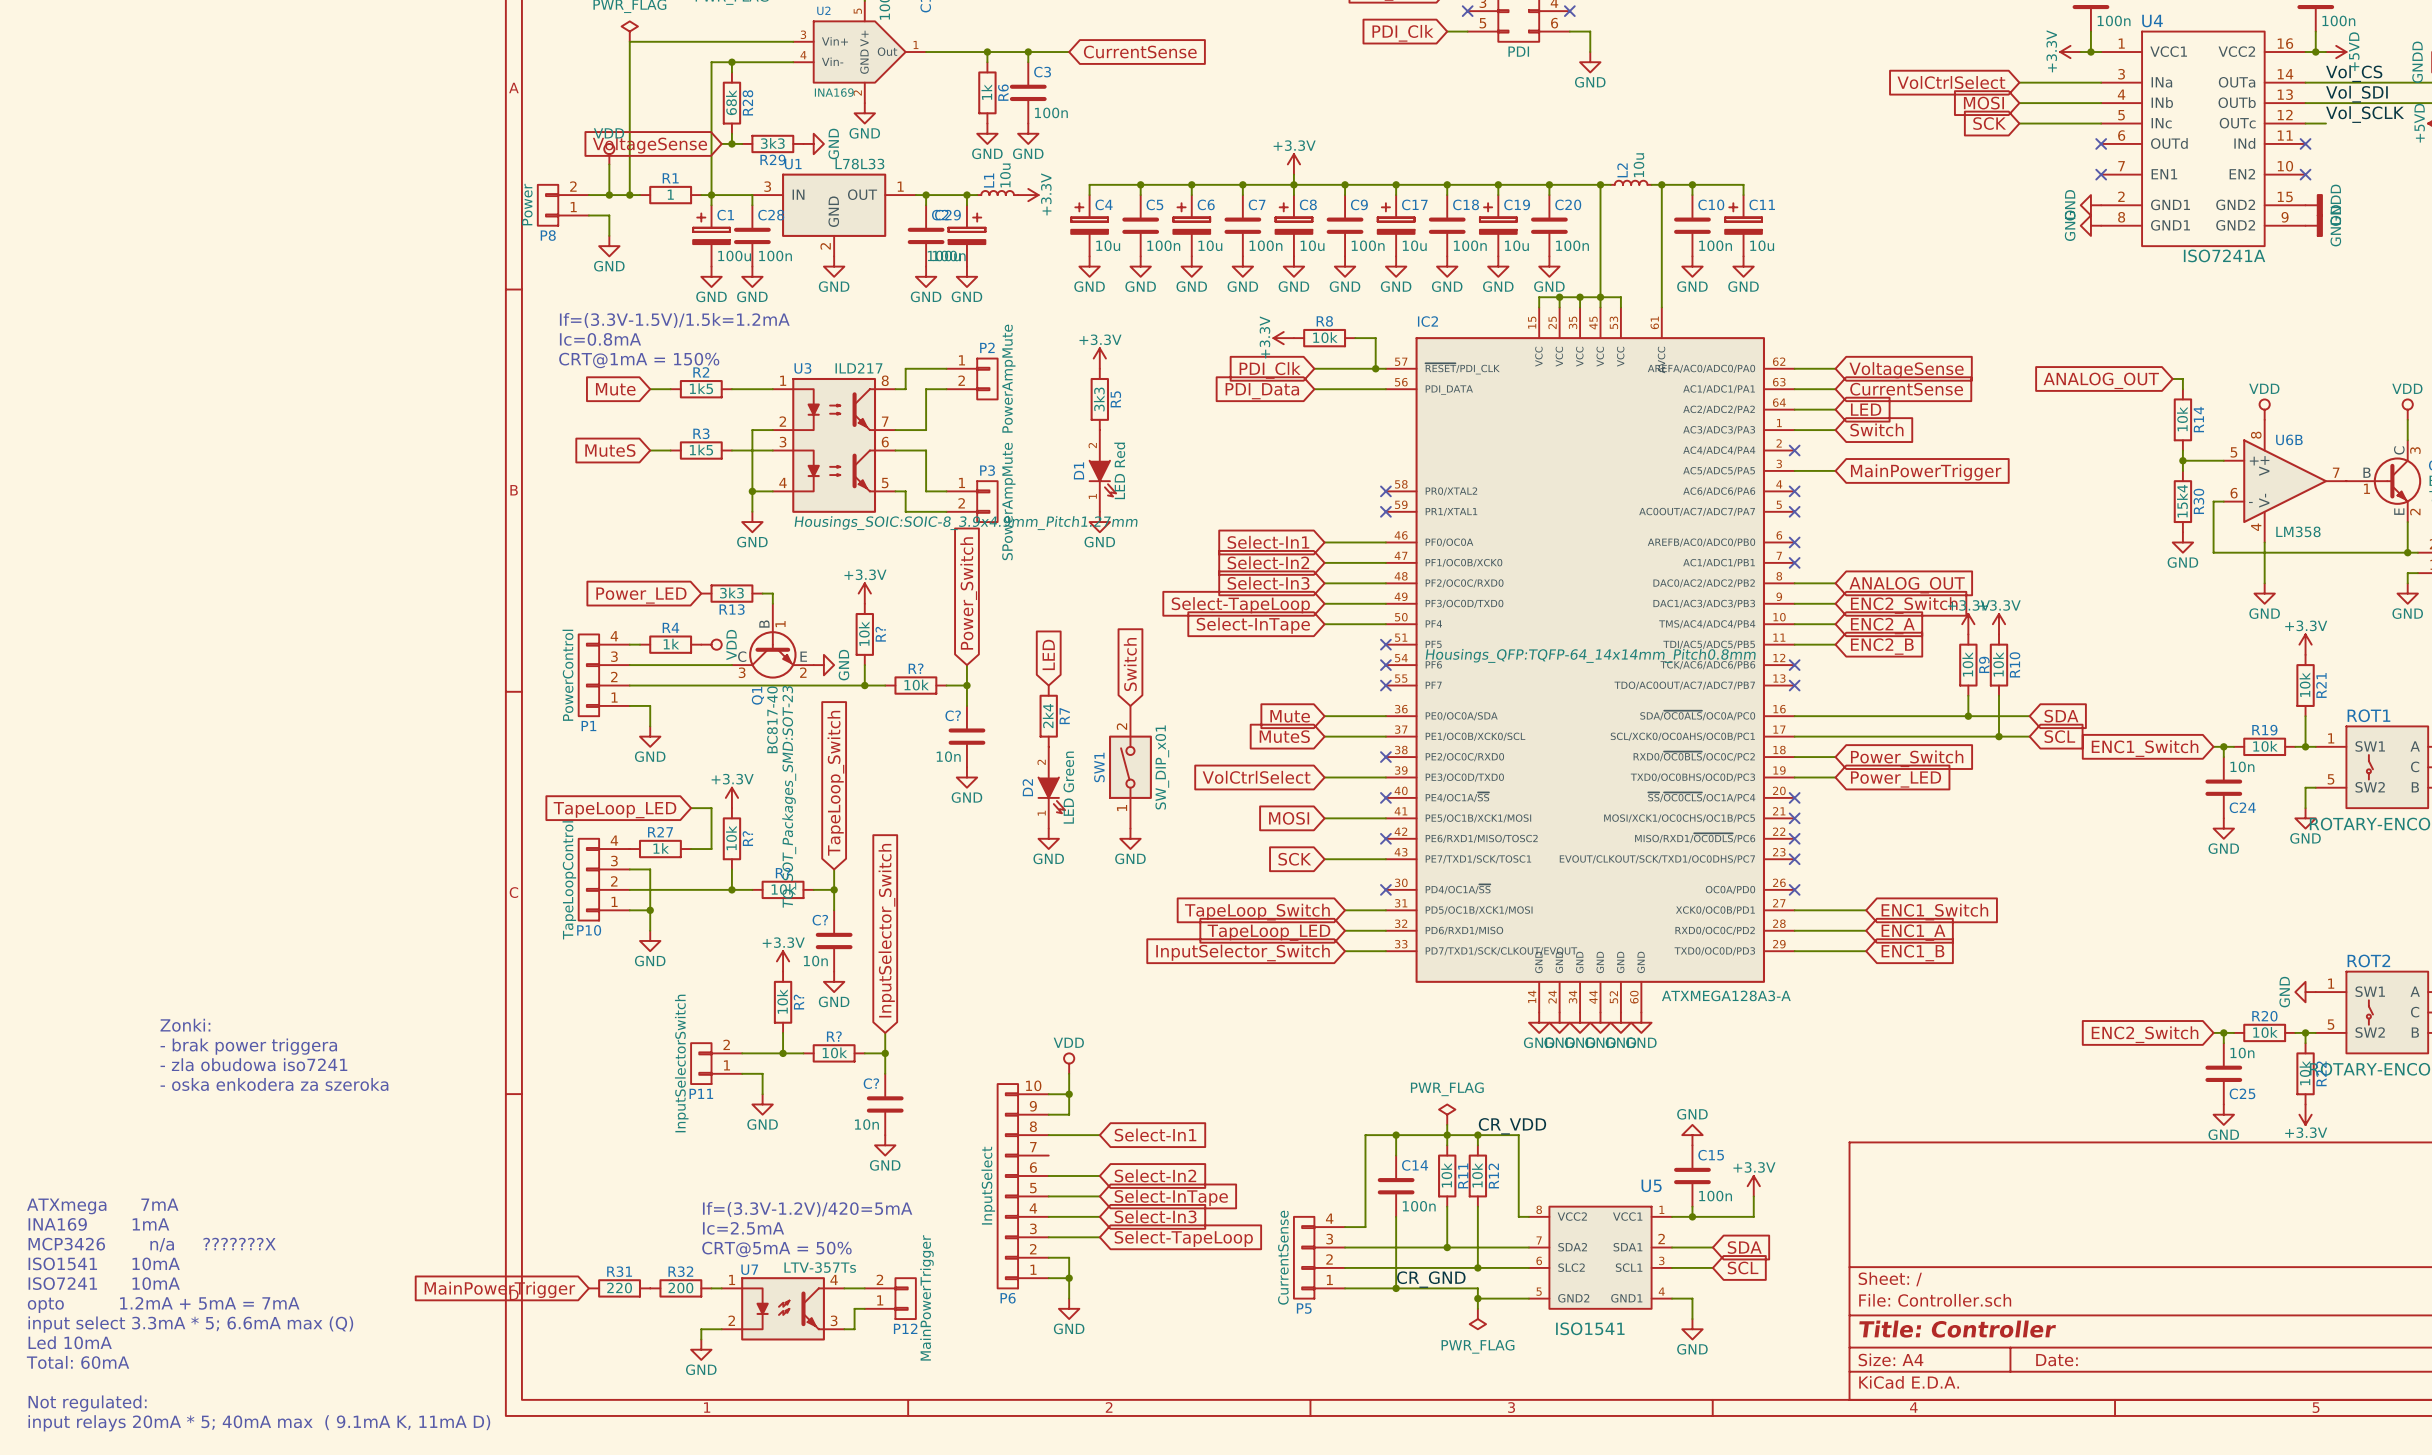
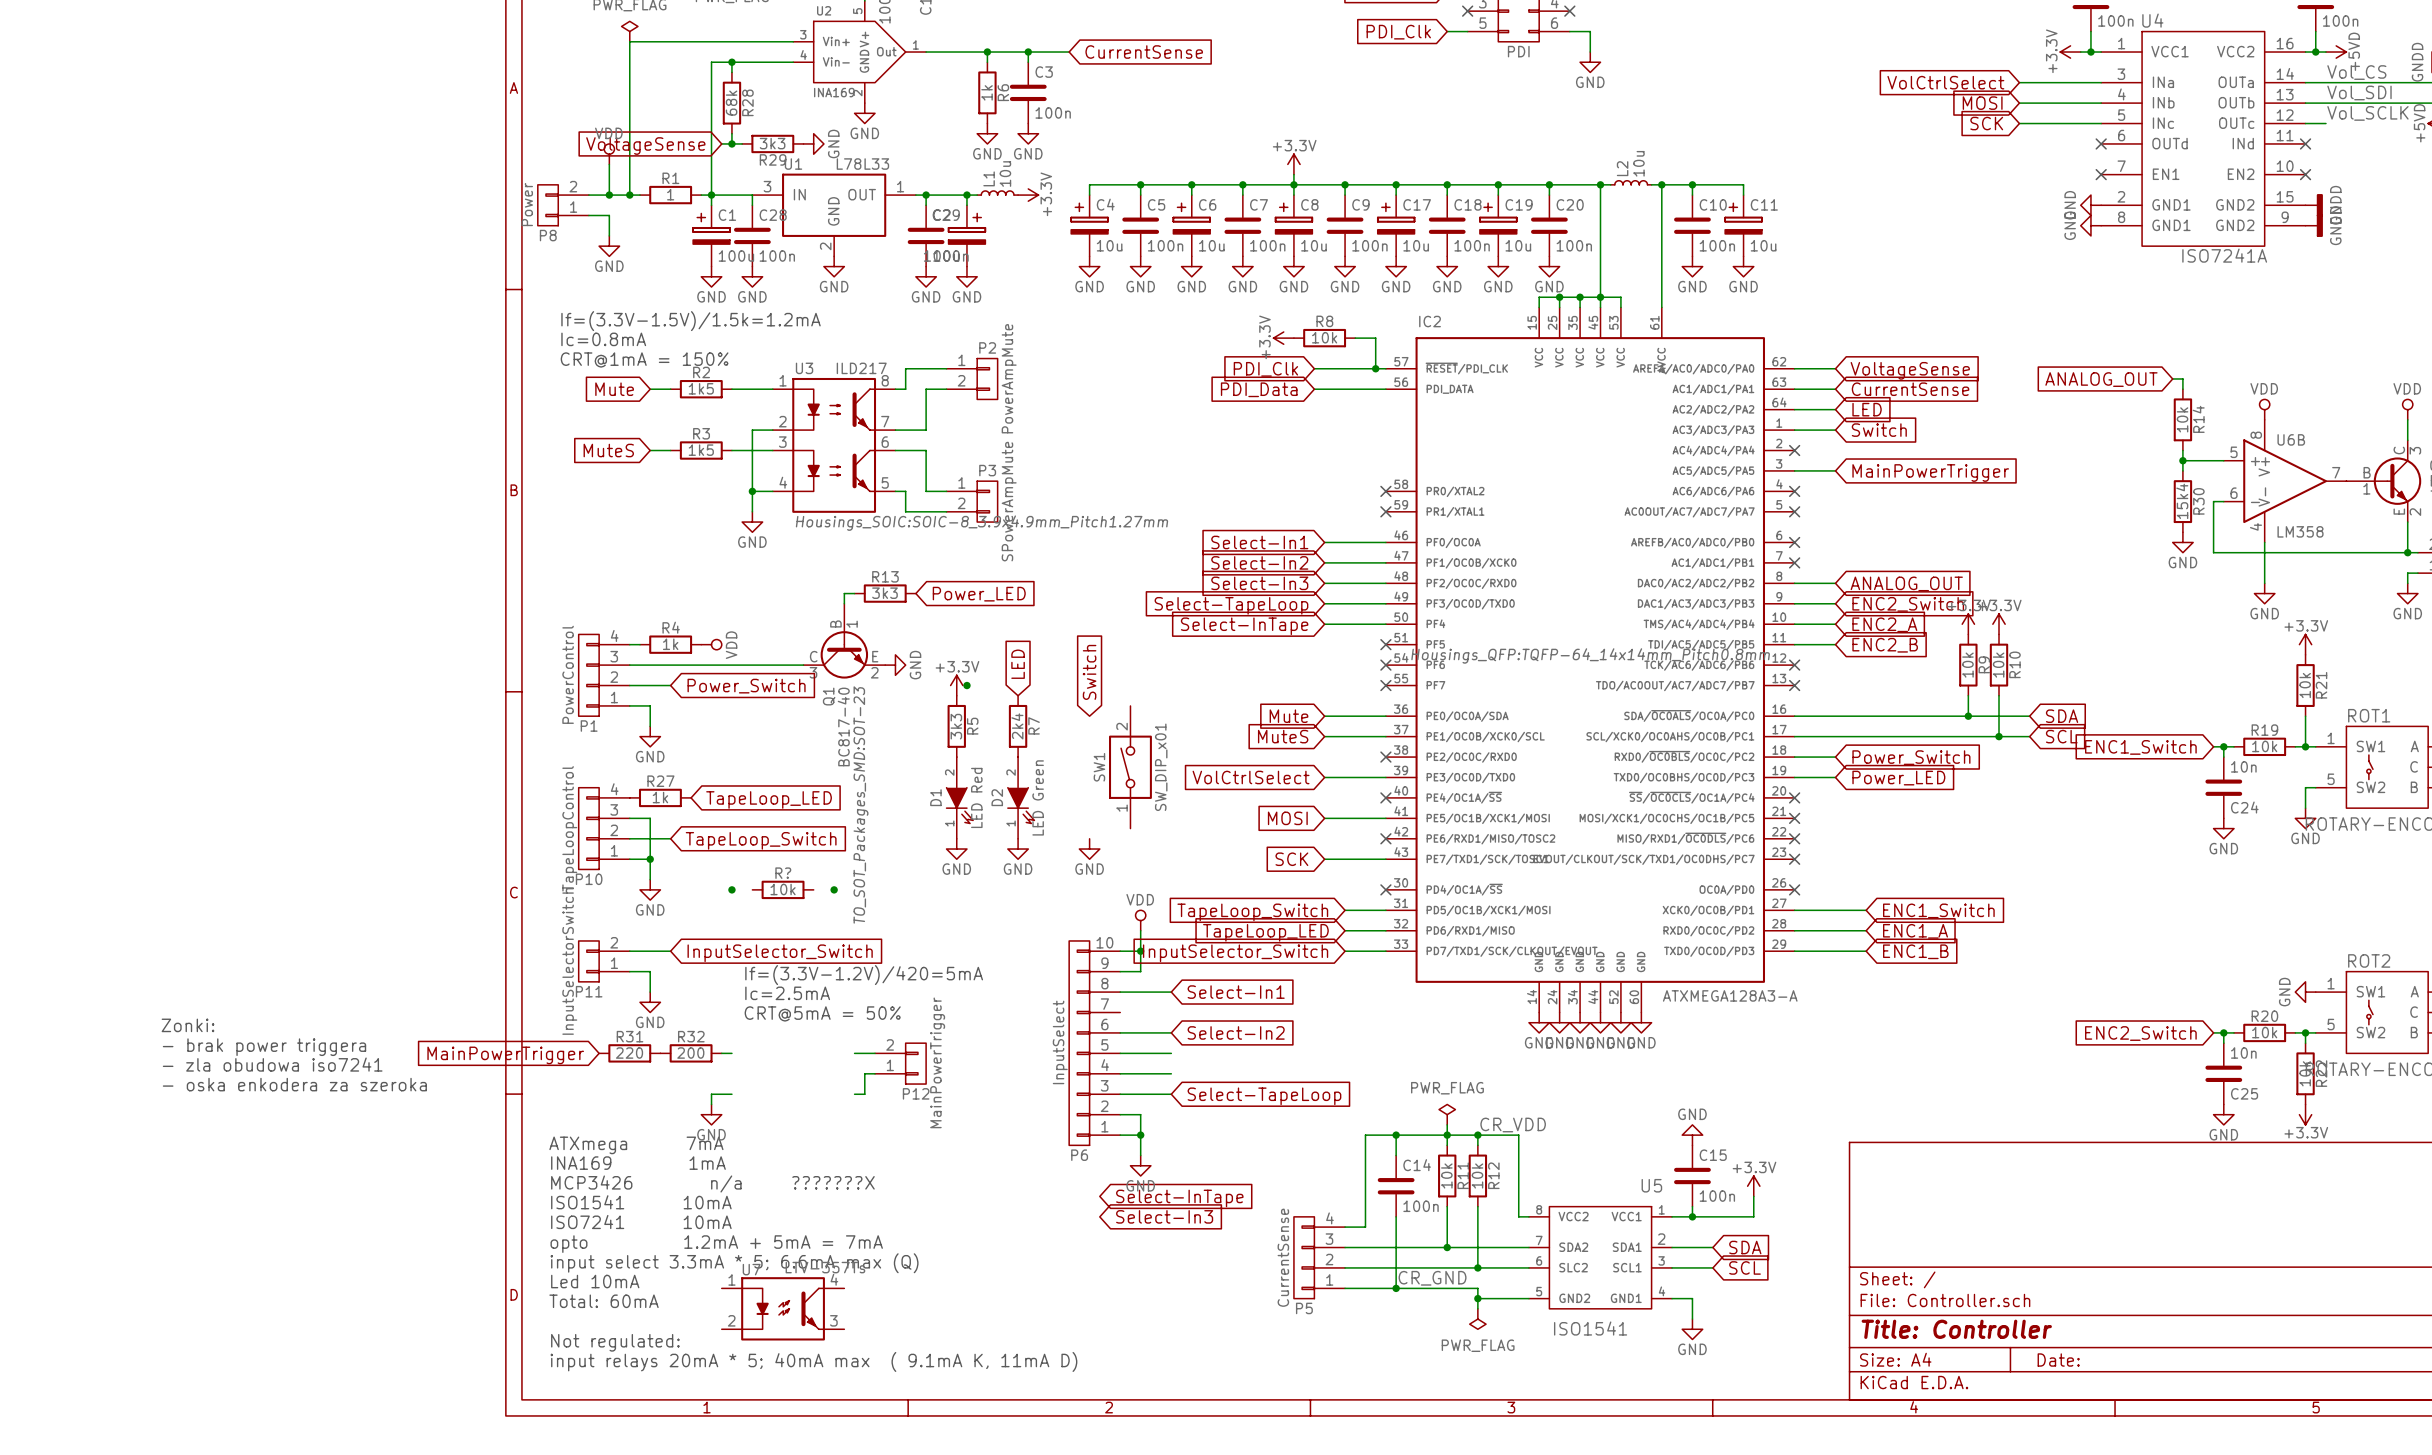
power symbol: +3.3V (1099, 358) -> none
R5 position: (1099, 399) -> (956, 726)
D1 position: (1102, 470) -> (959, 797)
power symbol: GND (1099, 522) -> none
R13 position: (731, 593) -> (885, 593)
wire: (762, 593) (772, 593) (772, 603) -> none
wire: none -> (854, 593) (844, 593) (844, 603)
power symbol: +3.3V (864, 593) -> none
global label: Power_Switch (968, 593) -> none
global label: Power_LED (641, 595) -> none
global label: none -> Power_LED (979, 594)
R13 name position: R13 (732, 609) -> R13 (885, 576)
R?: 10k (864, 634) -> none
Q1 position: (772, 641) -> (844, 641)
global label position: LED (1048, 654) -> LED (1018, 664)
global label position: Switch (1130, 664) -> Switch (1089, 672)
wire: none -> (731, 665) (803, 665)
power symbol: GND (823, 665) -> none
wire: (864, 665) (864, 685) -> none
power symbol: none -> GND (895, 665)
wire: (966, 665) (966, 705) -> none
wire: (670, 685) (885, 685) -> none
junction: (864, 685) -> none
R?: 10k (915, 685) -> none
wire: (946, 685) (966, 685) -> none
power symbol: none -> +3.3V (956, 685)
global label: none -> Power_Switch (746, 686)
R7 position: (1048, 716) -> (1018, 726)
C?: 10n (966, 736) -> none
power symbol: GND (966, 777) -> none
global label rotation: 0° (835, 783) -> 90° clockwise (761, 840)
D2 position: (1051, 787) -> (1021, 797)
power symbol: +3.3V (731, 797) -> none
wire: (691, 808) (711, 808) (711, 849) (691, 849) -> none
global label rotation: 0° (614, 810) -> 180° (769, 799)
global label position: TapeLoop_LED (614, 810) -> TapeLoop_LED (769, 799)
wire: none -> (629, 838) (670, 838)
R?: 10k (731, 838) -> none
power symbol: GND (1048, 838) -> none
power symbol: GND (1130, 838) -> none
R27 position: (660, 849) -> (660, 797)
power symbol: none -> GND (956, 849)
power symbol: none -> GND (1018, 849)
power symbol: none -> GND (1089, 849)
junction: none -> (650, 859)
wire: (629, 869) (650, 869) -> (629, 818) (650, 818) (650, 869)
wire: (731, 869) (731, 889) -> none
wire: (834, 869) (834, 910) -> none
P10 position: (604, 879) -> (604, 828)
wire: (650, 879) (650, 930) -> none
wire: (629, 889) (752, 889) -> none
power symbol: none -> GND (650, 889)
wire: (813, 889) (834, 889) -> none
wire: (629, 910) (650, 910) -> (629, 859) (650, 859)
junction: (650, 910) -> none
global label: InputSelector_Switch (886, 930) -> none
power symbol: GND (650, 940) -> none
C?: 10n (834, 940) -> none
wire: none -> (629, 951) (670, 951)
junction: none -> (1140, 951)
global label: none -> InputSelector_Switch (780, 953)
power symbol: +3.3V (783, 961) -> none
text: none -> If=(3.3V-1.2V)/420=5mA (864, 975)
power symbol: GND (834, 981) -> none
text: none -> Ic=2.5mA (787, 993)
power symbol: none -> GND (650, 1002)
R?: 10k (783, 1002) -> none
text: none -> CRT@5mA = 50% (822, 1013)
wire: (783, 1032) (783, 1053) -> none
wire: (885, 1032) (885, 1073) -> none
wire: (742, 1053) (803, 1053) -> none
junction: (783, 1053) -> none
R?: 10k (834, 1053) -> none
junction: (885, 1053) -> none
global label: none -> MainPowerTrigger (505, 1055)
P11 position: (716, 1063) -> (604, 961)
power symbol position: VDD (1069, 1063) -> VDD (1140, 920)
wire: (742, 1073) (762, 1073) (762, 1094) -> (629, 971) (650, 971) (650, 992)
wire: none -> (875, 1073) (864, 1073) (864, 1094) (854, 1094)
wire: (1069, 1073) (1069, 1114) (1048, 1114) -> (1140, 930) (1140, 971) (1120, 971)
wire: none -> (731, 1094) (711, 1094) (711, 1104)
wire: (1048, 1094) (1069, 1094) -> (1120, 951) (1140, 951)
junction: (1069, 1094) -> none
power symbol position: GND (762, 1104) -> GND (711, 1114)
C?: 10n (885, 1104) -> none
global label position: Select-In1 (1155, 1134) -> Select-In1 (1236, 992)
wire: (1048, 1135) (1099, 1135) -> (1120, 992) (1171, 992)
junction: none -> (1140, 1135)
text: none -> ATXmega 7mA (636, 1145)
power symbol: GND (885, 1145) -> none
text: none -> INA169 1mA (638, 1163)
power symbol: none -> GND (1140, 1165)
wire: (1048, 1175) (1099, 1175) -> (1120, 1032) (1171, 1032)
global label position: Select-In2 (1155, 1175) -> Select-In2 (1236, 1032)
text: none -> MCP3426 n/a ???????X (712, 1183)
P6 position: (1023, 1186) -> (1094, 1043)
wire: (1048, 1196) (1099, 1196) -> (1120, 1053) (1171, 1053)
text: none -> ISO1541 10mA (641, 1202)
text: ATXmega 7mA (102, 1206) -> none
text: If=(3.3V-1.2V)/420=5mA (807, 1209) -> none
wire: (1048, 1216) (1099, 1216) -> (1120, 1073) (1171, 1073)
text: none -> ISO7241 10mA (641, 1222)
text: INA169 1mA (98, 1224) -> none
text: Ic=2.5mA (743, 1228) -> none
wire: (1048, 1237) (1099, 1237) -> (1120, 1094) (1171, 1094)
global label position: Select-TapeLoop (1183, 1238) -> Select-TapeLoop (1264, 1096)
text: none -> opto 1.2mA + 5mA = 7mA (716, 1244)
text: MCP3426 n/a ???????X (152, 1244) -> none
text: CRT@5mA = 50% (776, 1249) -> none
wire: (1048, 1257) (1069, 1257) (1069, 1298) -> (1120, 1114) (1140, 1114) (1140, 1155)
text: ISO1541 10mA (104, 1263) -> none
text: none -> input select 3.3mA * 5; 6.6mA max (Q) (734, 1263)
wire: (1048, 1278) (1069, 1278) -> (1120, 1135) (1140, 1135)
junction: (1069, 1278) -> none
text: none -> Led 10mA (595, 1281)
text: ISO7241 10mA (104, 1283) -> none
R31 position: (619, 1288) -> (629, 1053)
R32 position: (680, 1288) -> (691, 1053)
wire: (711, 1288) (721, 1288) -> none
wire: (844, 1288) (864, 1288) -> none
global label: MainPowerTrigger (499, 1289) -> none
P12 position: (890, 1298) -> (900, 1063)
text: none -> Total: 60mA (604, 1301)
text: opto 1.2mA + 5mA = 7mA (163, 1304) -> none
wire: (864, 1308) (854, 1308) (854, 1329) (844, 1329) -> none
power symbol: GND (1069, 1308) -> none
text: input select 3.3mA * 5; 6.6mA max (Q) (190, 1324) -> none
wire: (721, 1329) (701, 1329) (701, 1339) -> none
text: Led 10mA (70, 1342) -> none
text: none -> Not regulated: (615, 1342)
power symbol: GND (701, 1349) -> none
text: none -> input relays 20mA * 5; 40mA max ( 9.1mA K, 11mA D) (813, 1361)
text: Total: 60mA (78, 1362) -> none
text: Not regulated: (87, 1403) -> none
text: input relays 20mA * 5; 40mA max ( 9.1mA K, 11mA D) (259, 1423) -> none

